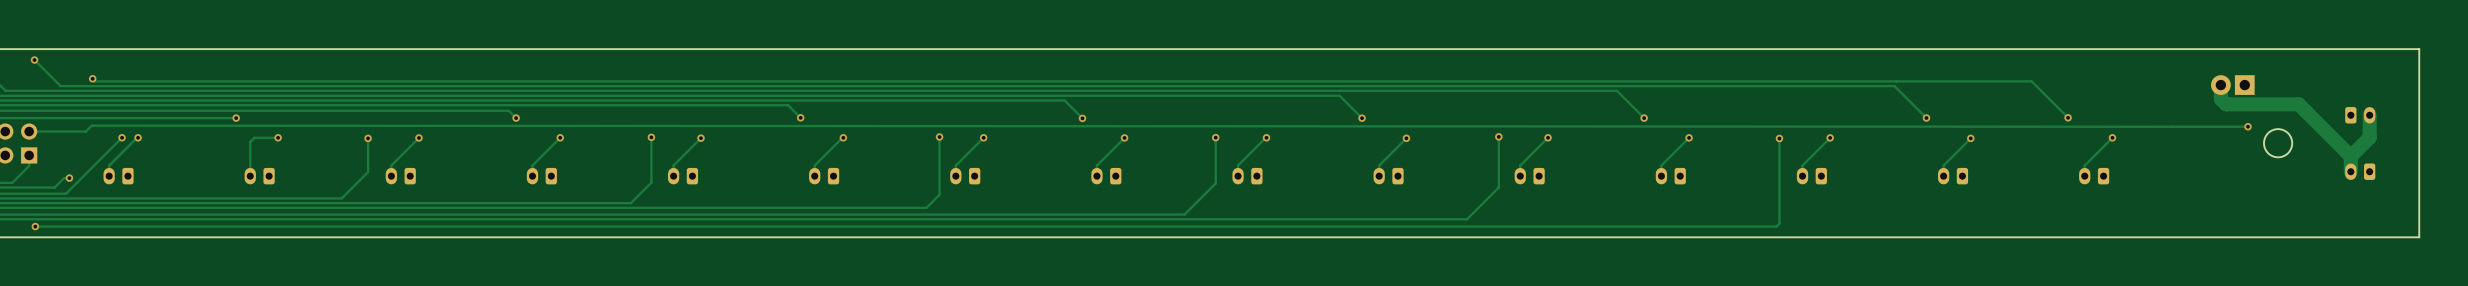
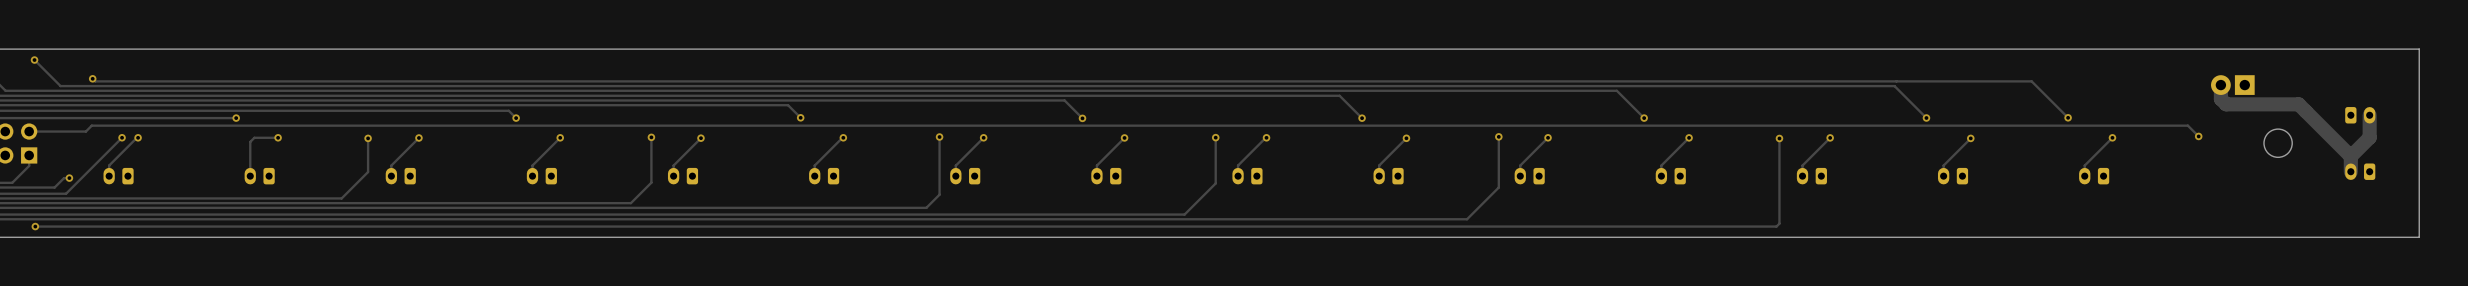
track: (91, 125) (2247, 126) -> (91, 125) (2187, 125) (2198, 136)
via position: (2247, 126) -> (2198, 136)

